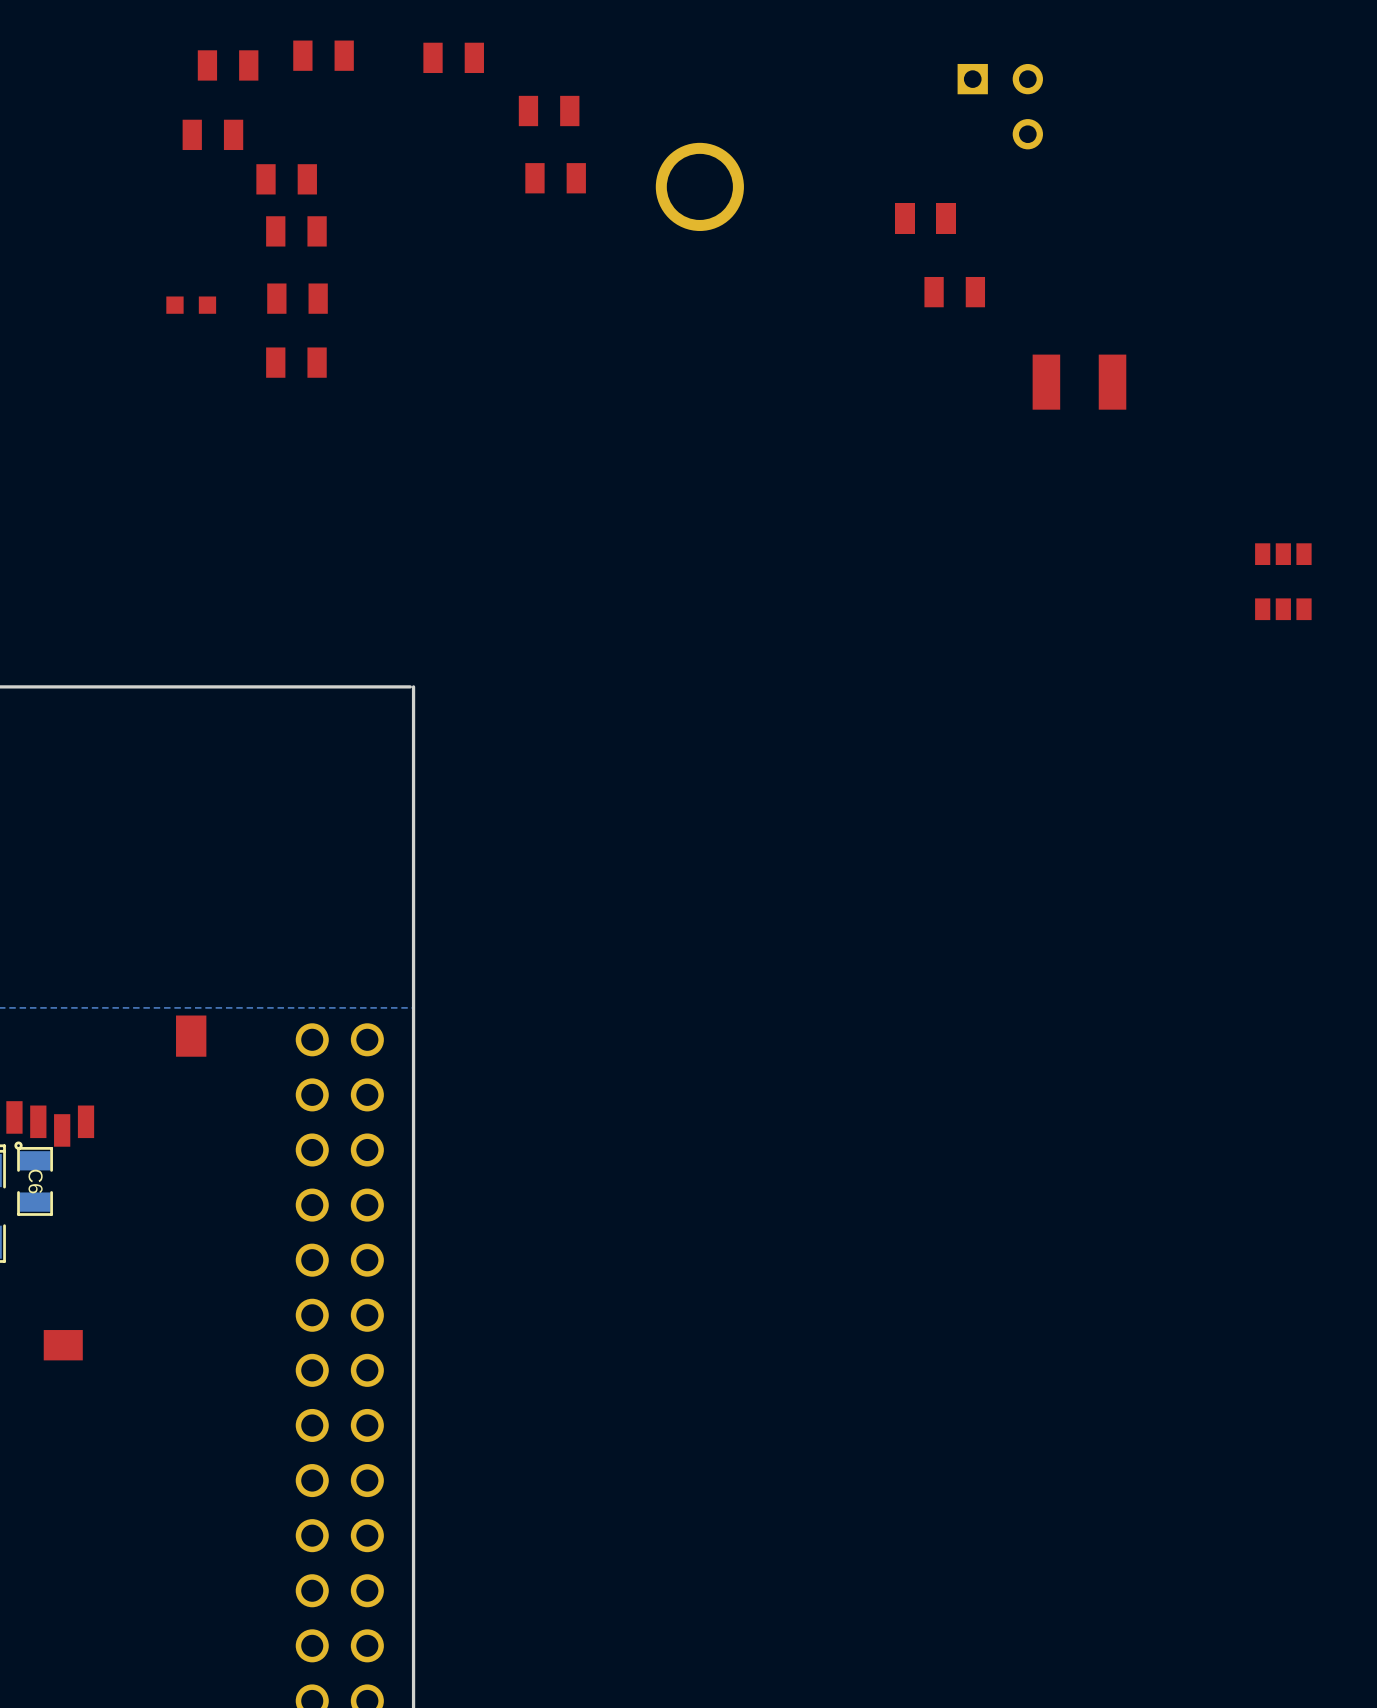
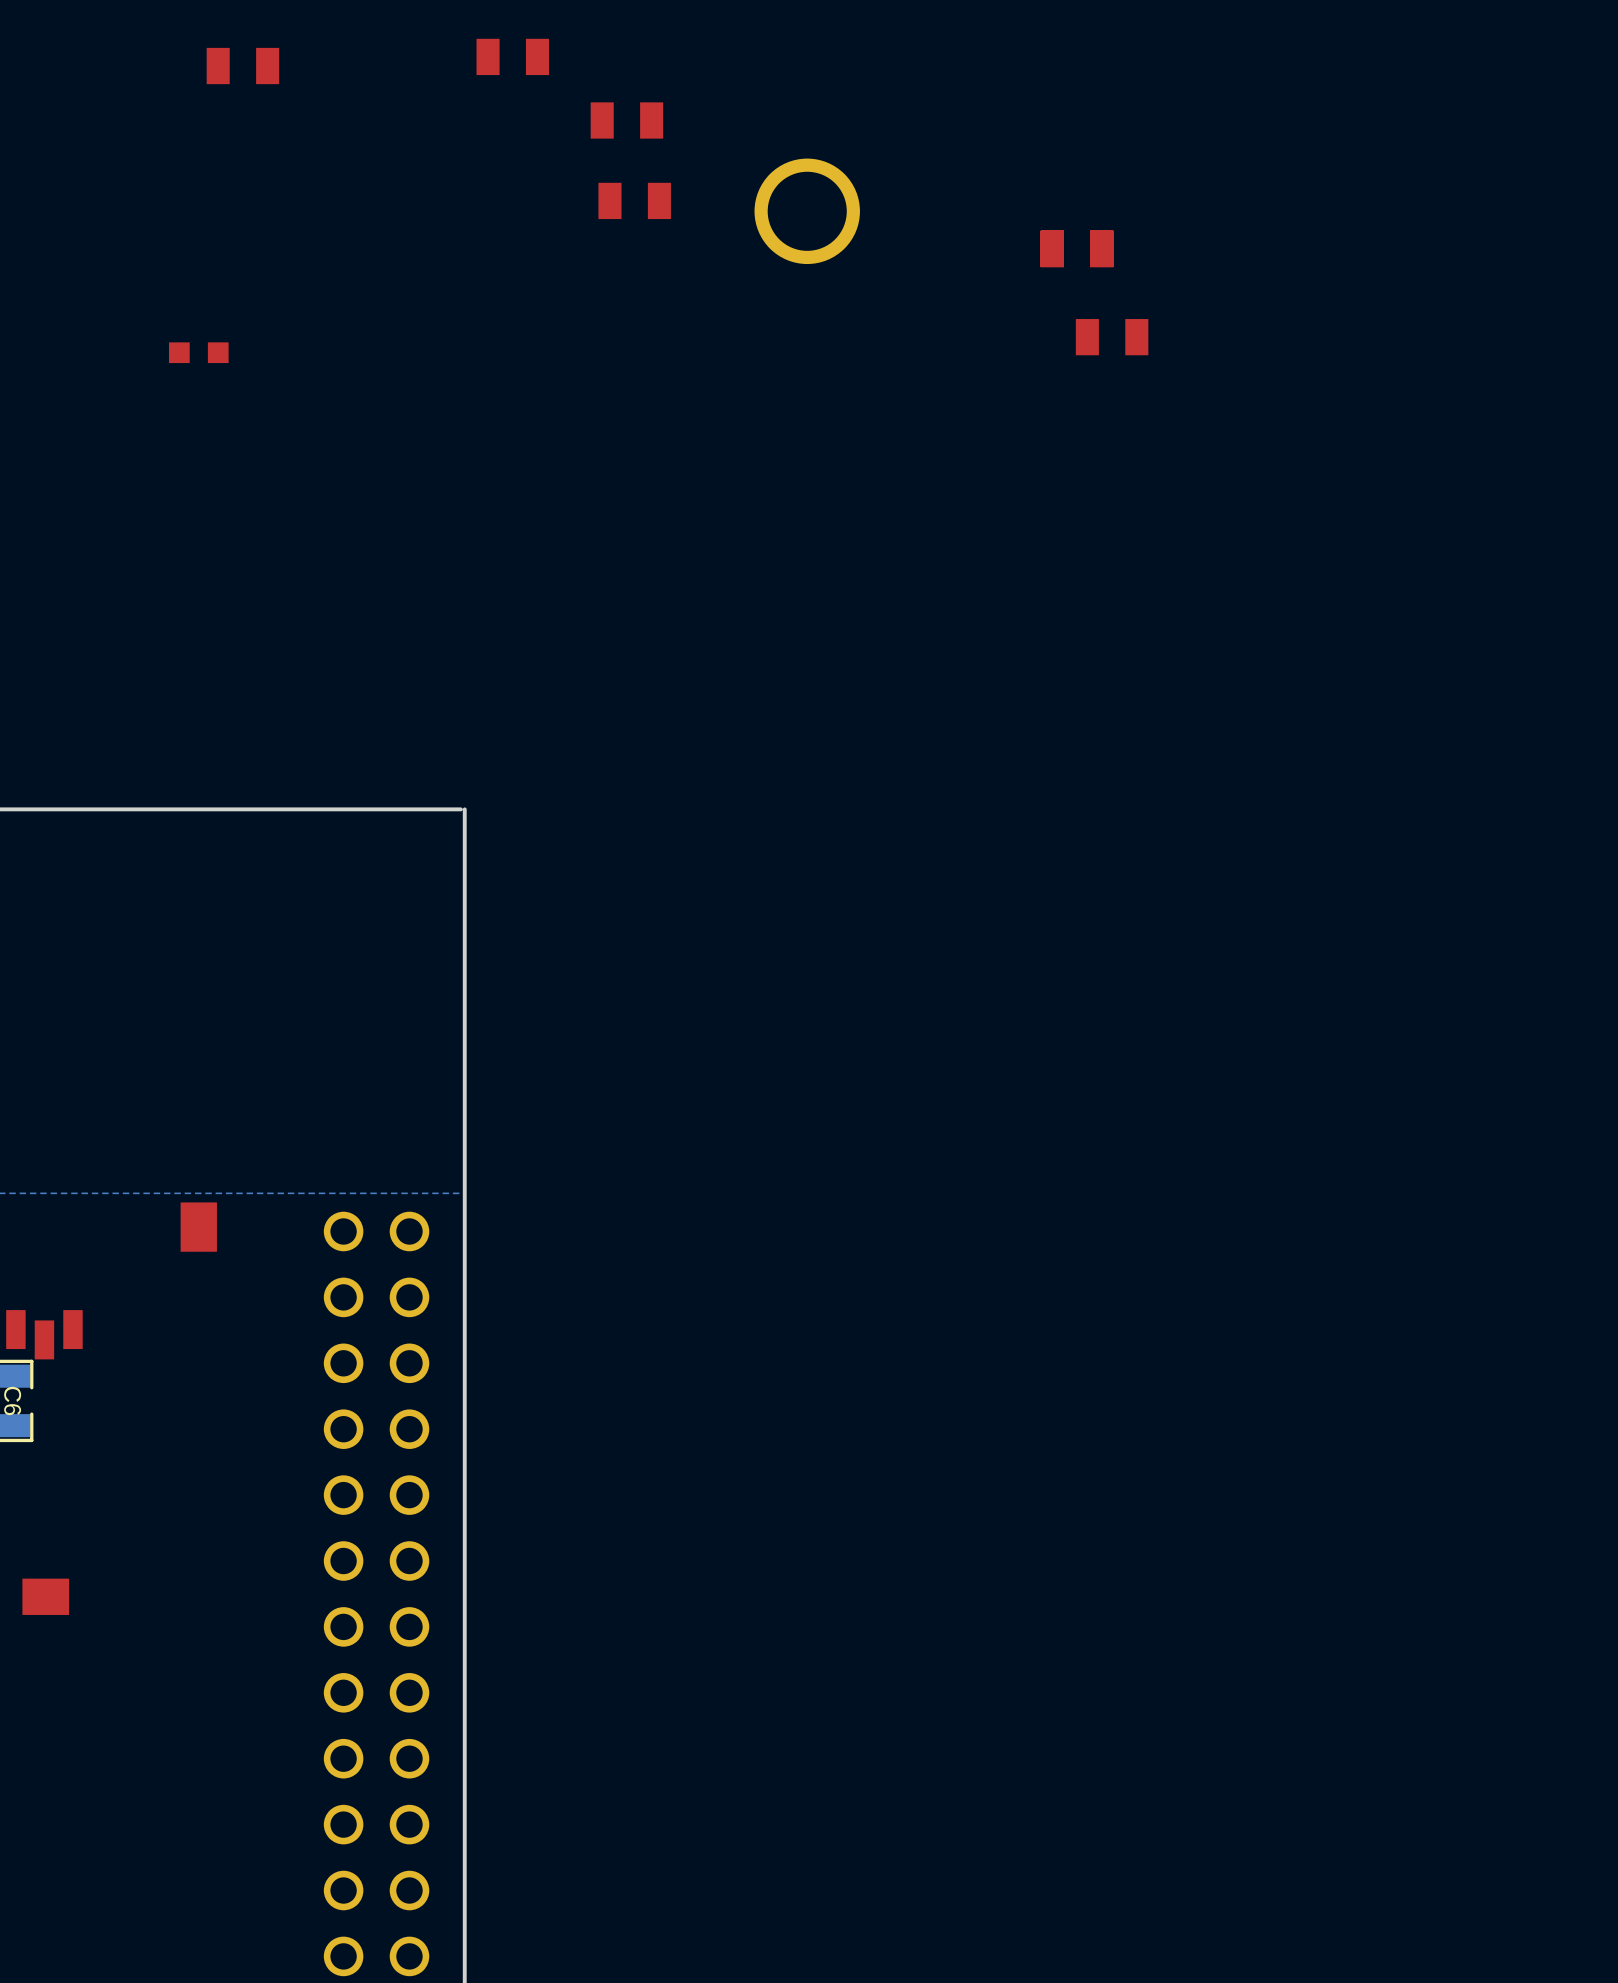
part: (323, 55) -> none
part: (1000, 106) -> none
part: (212, 134) -> none
part: (286, 179) -> none
part: (296, 231) -> none
part: (297, 298) -> none
part: (296, 362) -> none
part: (1079, 382) -> none
part: (1283, 581) -> none

